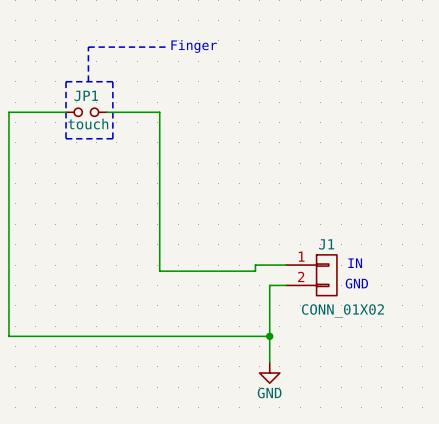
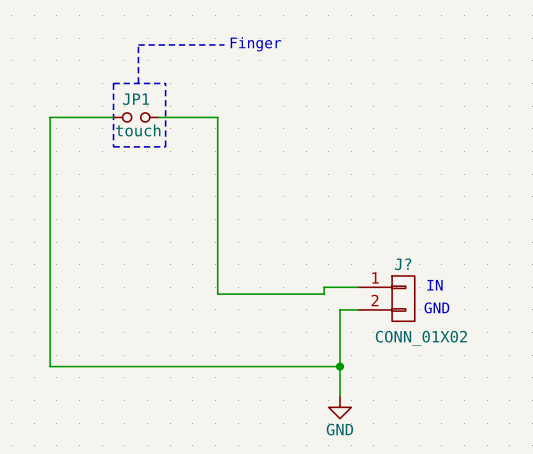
J1 name: J1 (326, 244) -> J? (403, 264)

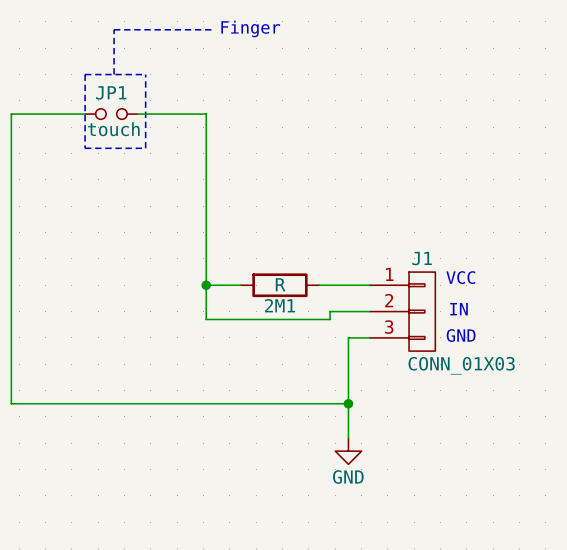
text: none -> VCC (460, 277)
wire: none -> (206, 285) (240, 285)
junction: none -> (206, 285)
2M1: none -> R (279, 285)
wire: none -> (319, 285) (369, 285)
J1: none -> CONN_01X03 (402, 311)
J?: CONN_01X02 (386, 298) -> none

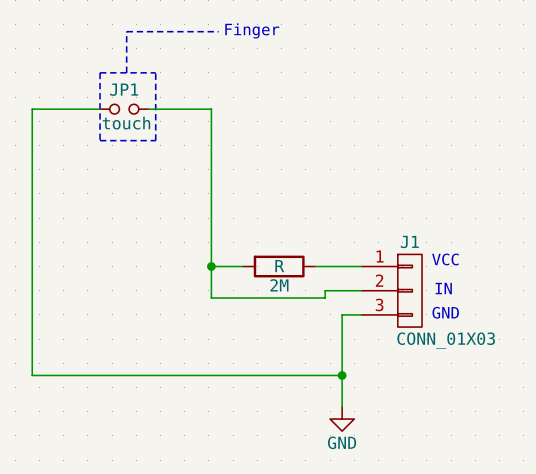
2M1 name: 2M1 (280, 305) -> 2M (279, 285)

